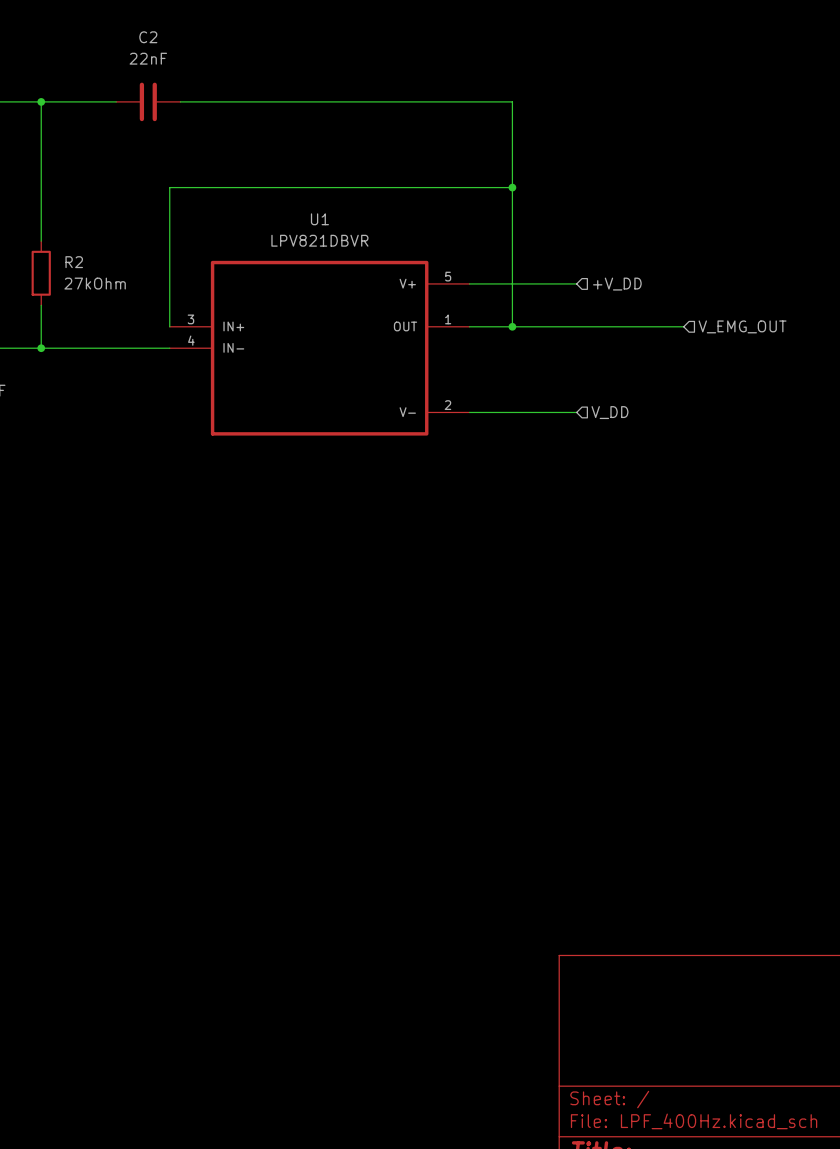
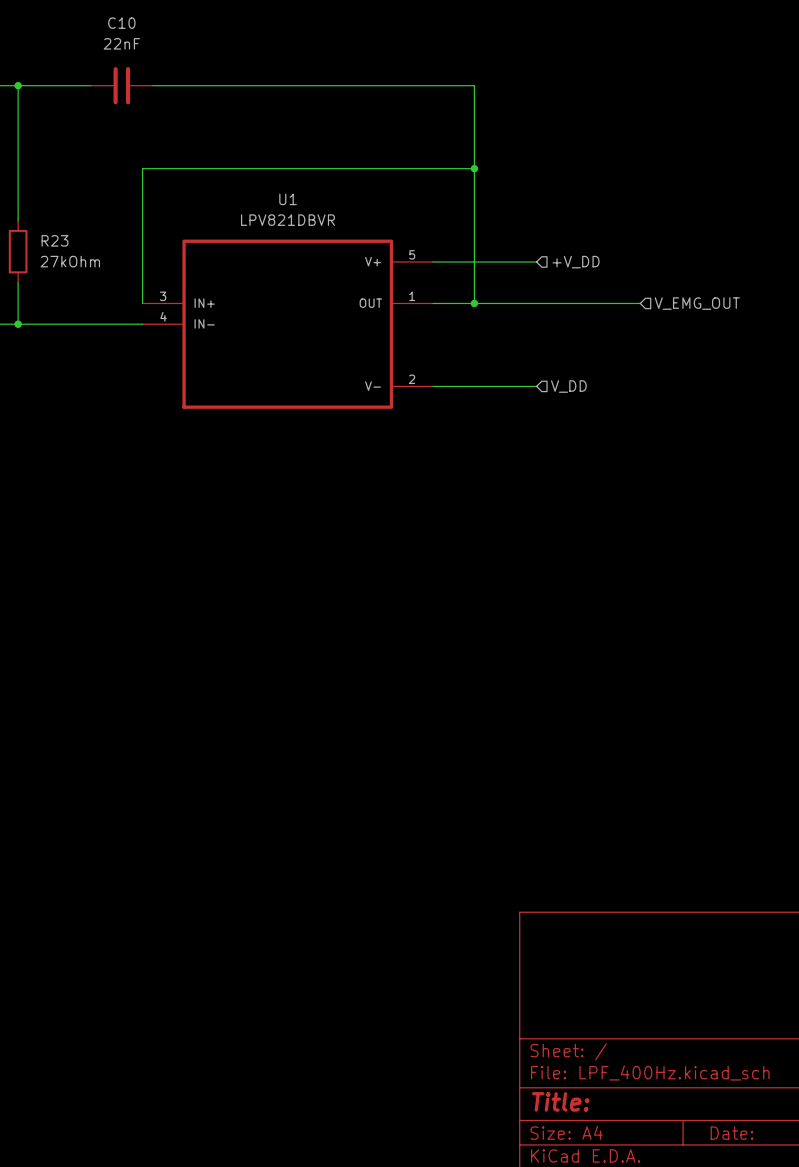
C2 name: C2 (148, 37) -> C10 (121, 23)
R2 name: R2 (74, 262) -> R23 (55, 240)

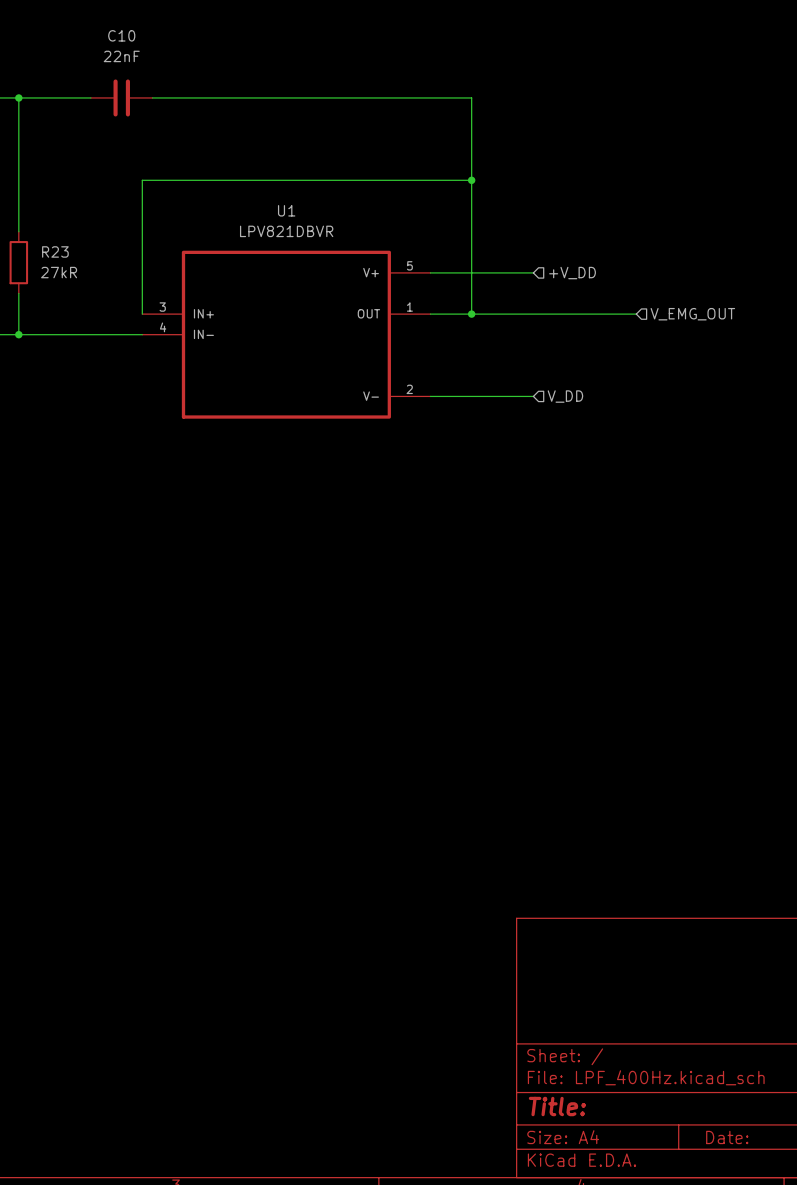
R23 value: 27kOhm (70, 261) -> 27kR (59, 272)

